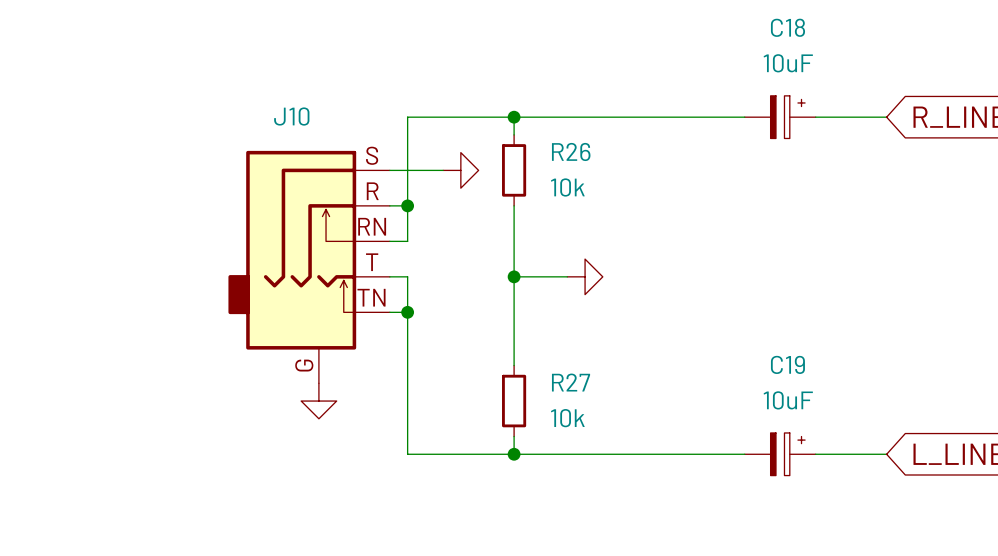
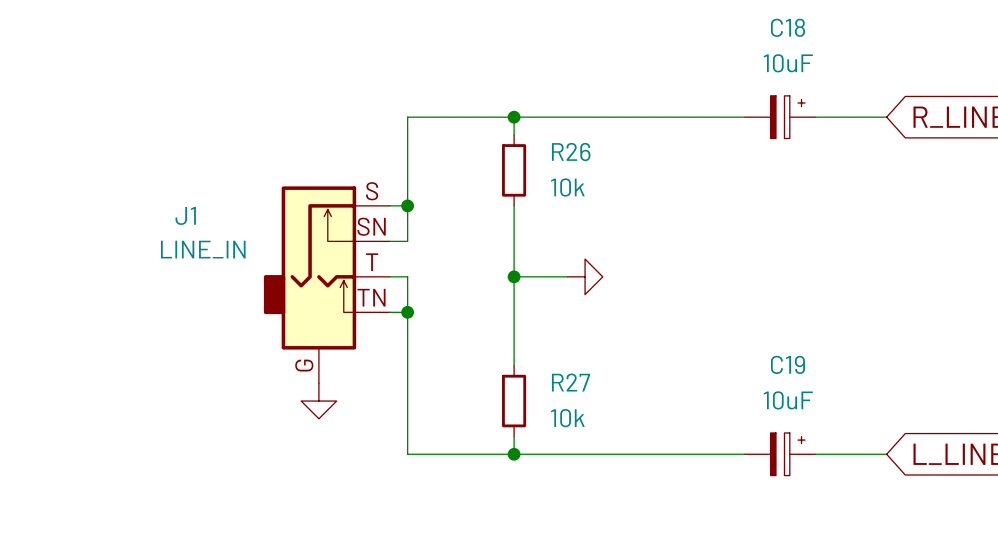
wire: (389, 170) (443, 170) -> none
power symbol: (460, 170) -> none
J10: (309, 267) -> none
J1: none -> LINE_IN (326, 284)

